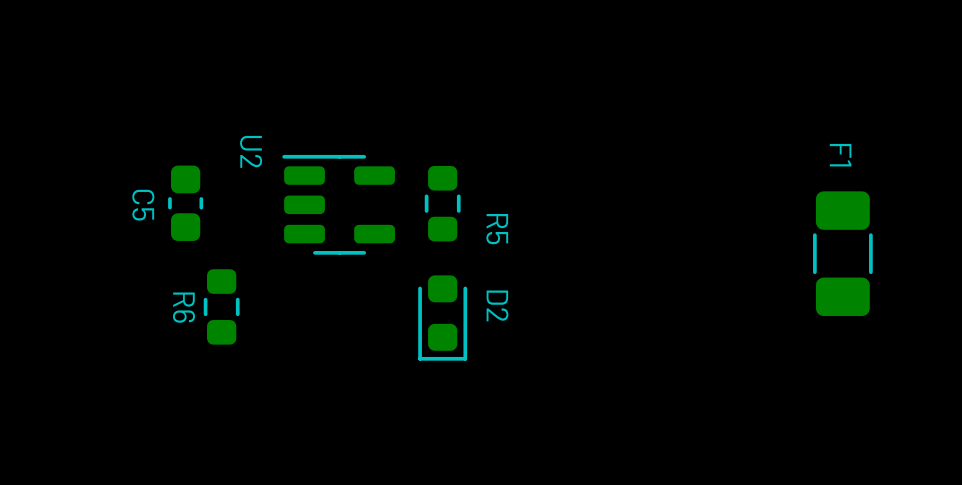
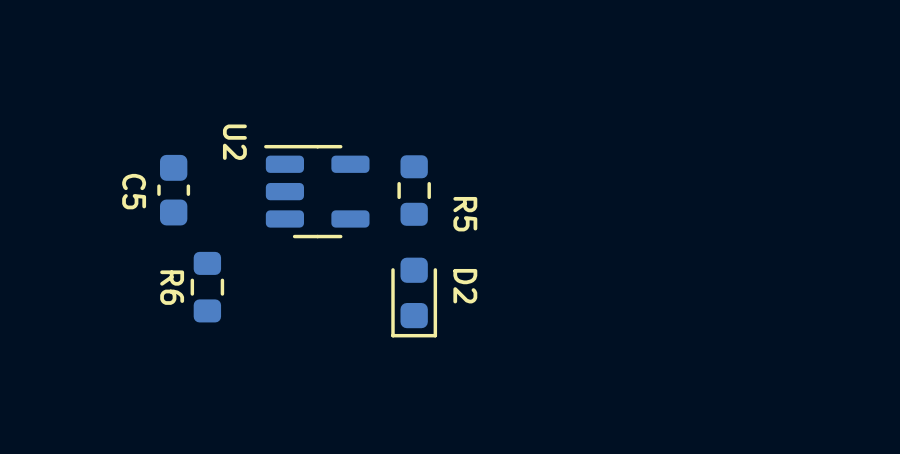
F1: (842, 253) -> none

